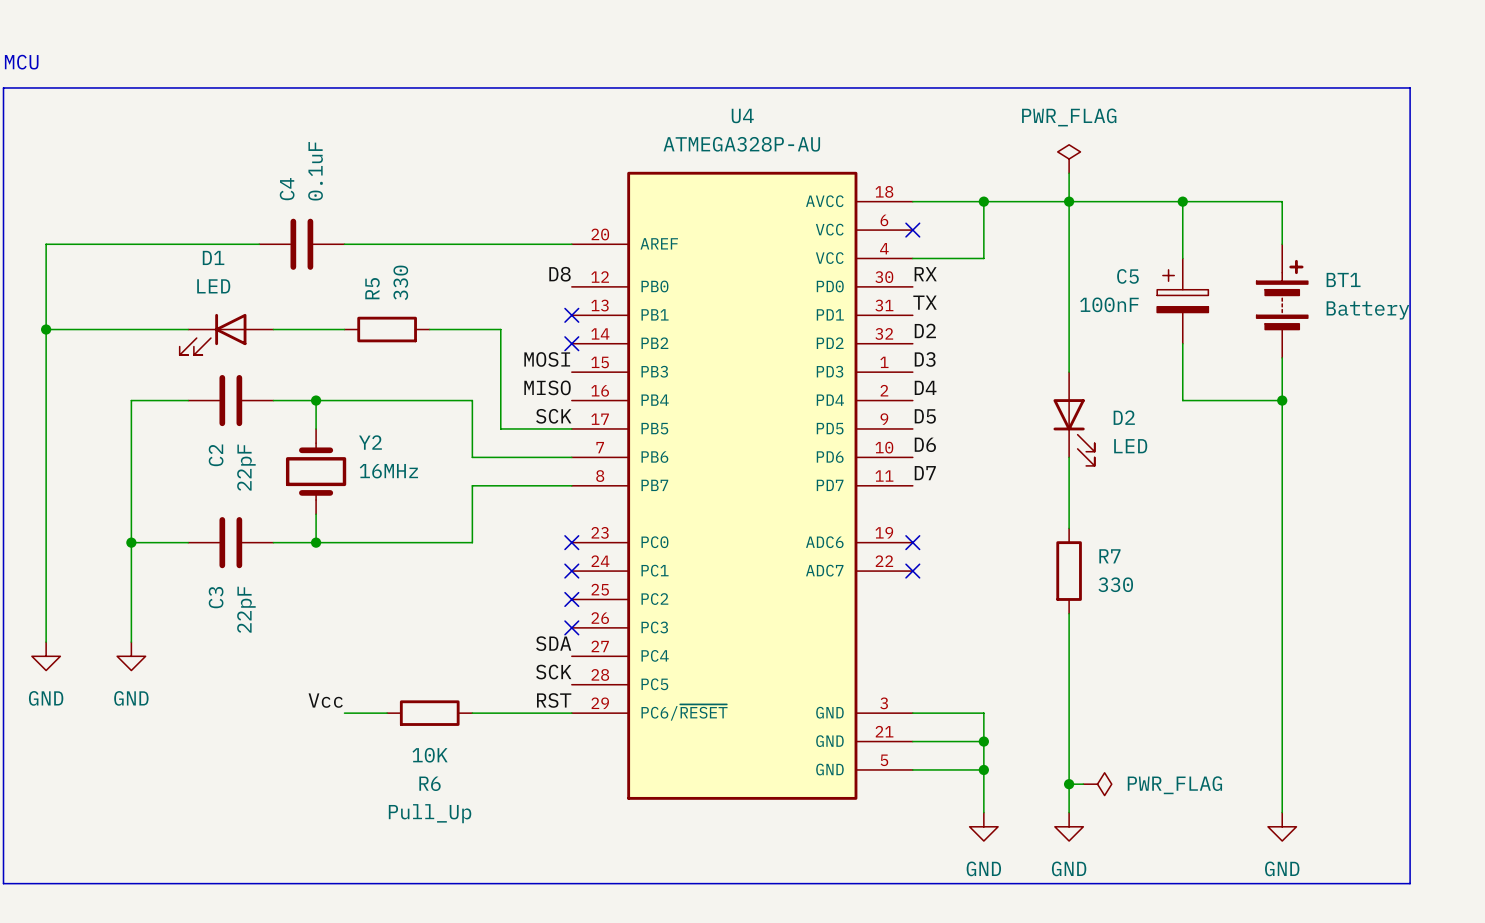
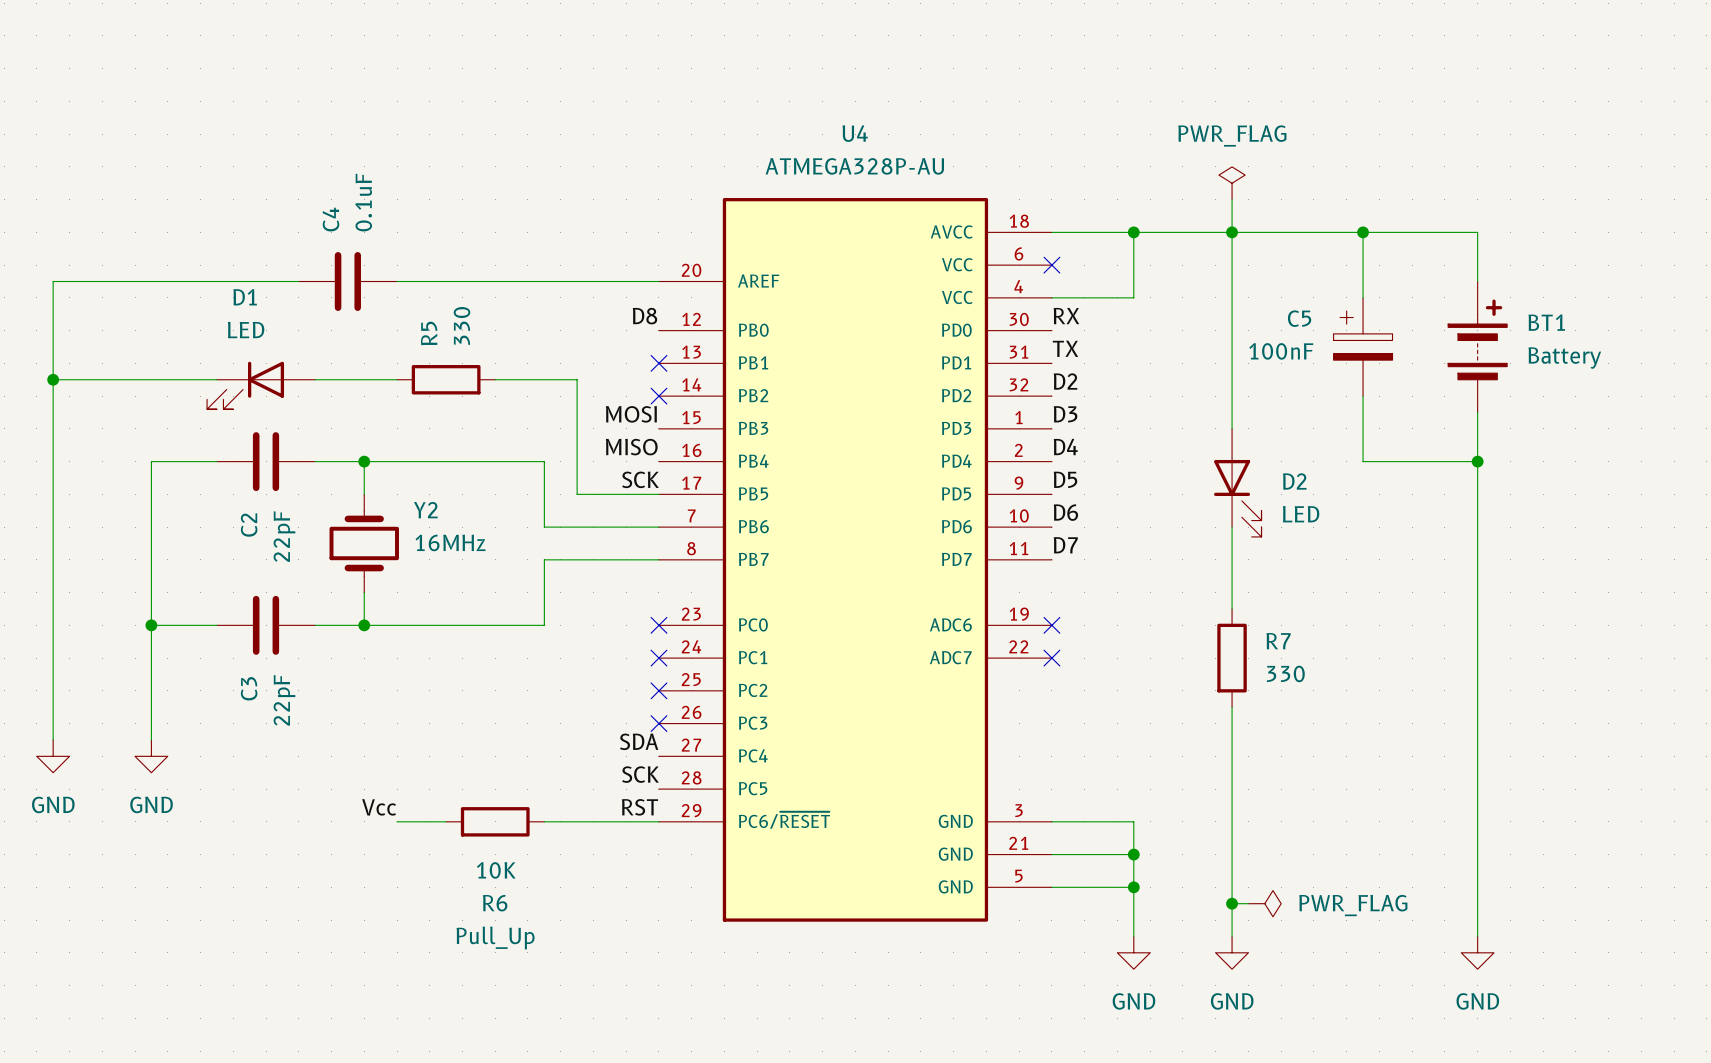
text: MCU (21, 62) -> none
line: (3, 87) (1410, 87) (1410, 883) (3, 883) (3, 87) -> none

